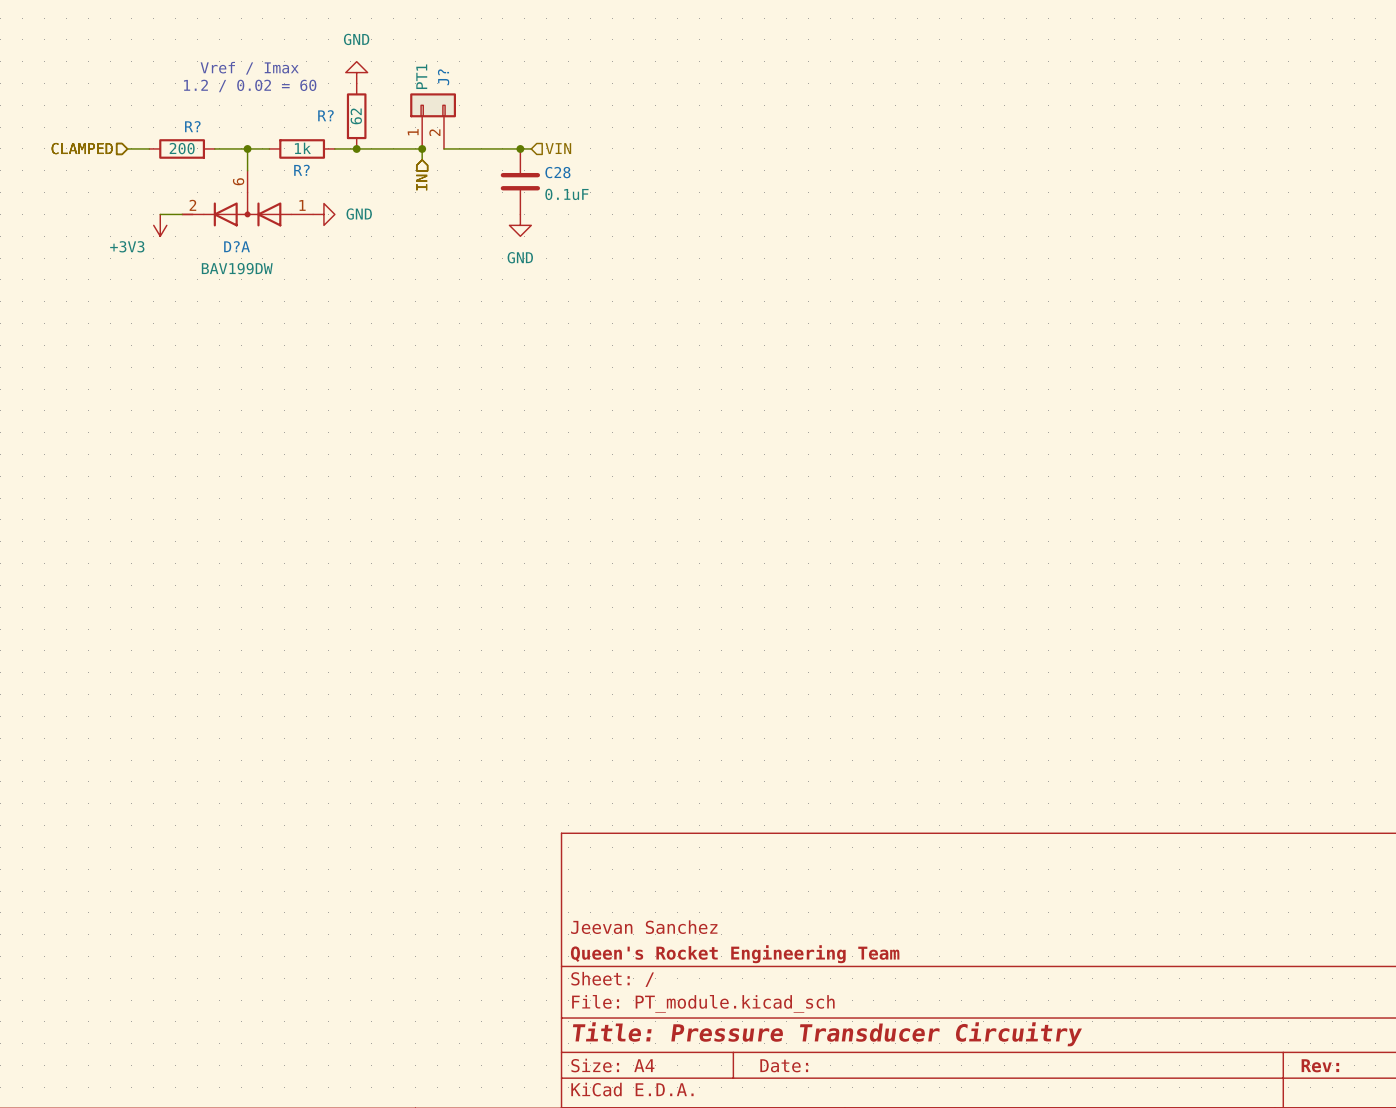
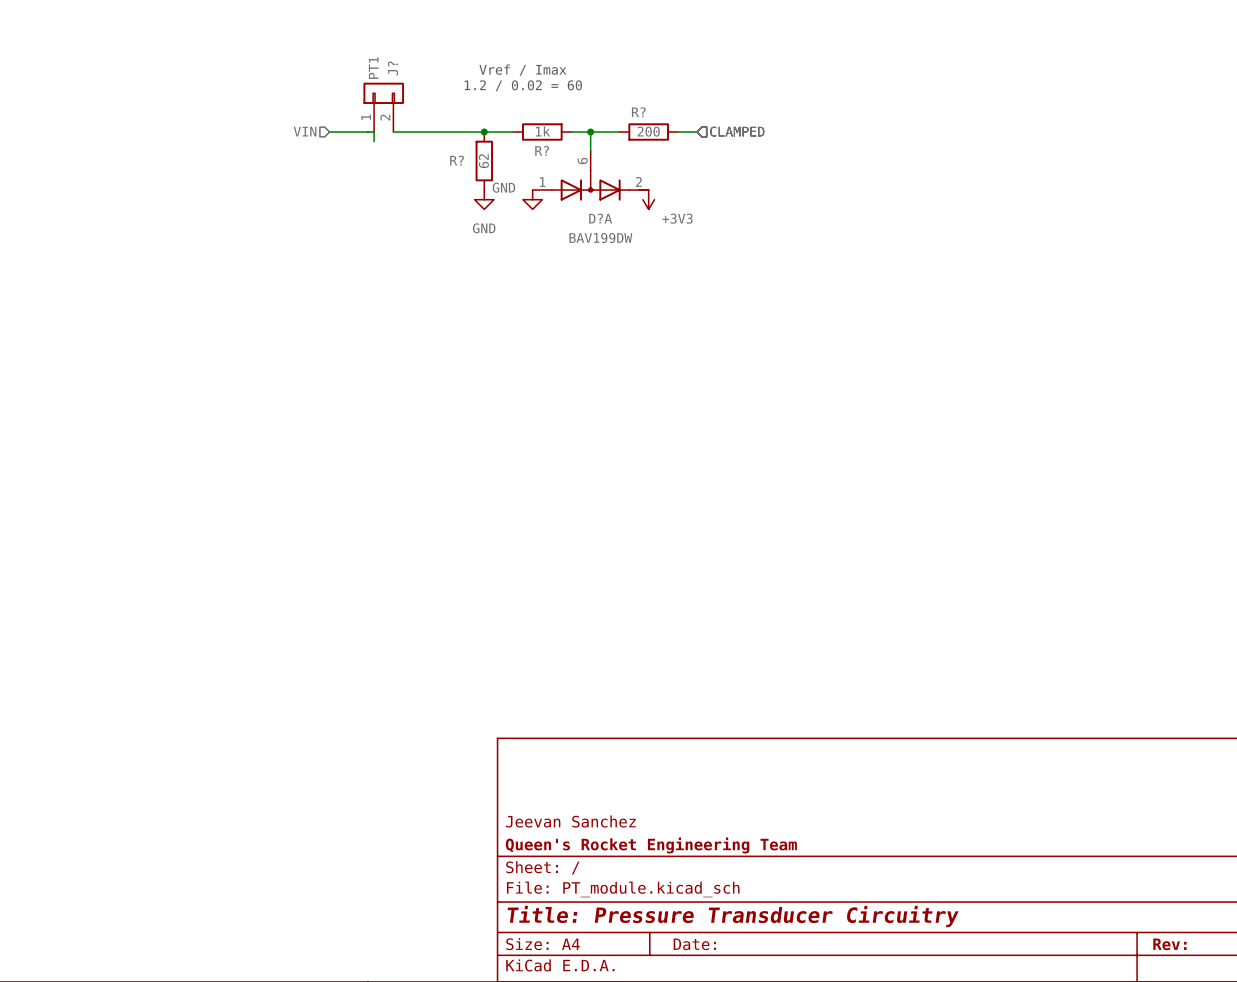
text: Vref / Imax (249, 68) -> none
power symbol: GND (356, 72) -> none
text: none -> Vref / Imax (522, 70)
text: 1.2 / 0.02 = 60 (250, 85) -> none
text: none -> 1.2 / 0.02 = 60 (523, 85)
R? position: (356, 116) -> (484, 161)
hierarchical label: CLAMPED (82, 148) -> none
wire: (127, 148) (149, 148) -> none
R?: 200 (182, 148) -> none
wire: (214, 148) (269, 148) -> none
wire: (247, 148) (247, 170) -> none
junction: (247, 148) -> none
R?: 1k (302, 148) -> none
wire: (334, 148) (371, 148) -> none
junction: (356, 148) -> none
junction: (422, 148) -> none
junction position: (520, 148) -> (484, 132)
wire: none -> (470, 132) (513, 132)
hierarchical label rotation: 0° (558, 148) -> 180° (305, 131)
hierarchical label position: VIN (558, 148) -> VIN (305, 131)
R?: none -> 1k (542, 132)
wire: none -> (571, 132) (619, 132)
wire: none -> (590, 132) (590, 151)
junction: none -> (590, 132)
R?: none -> 200 (648, 132)
wire: none -> (677, 132) (697, 132)
hierarchical label: none -> CLAMPED (737, 131)
C28: 0.1uF (520, 181) -> none
hierarchical label: IN (421, 182) -> none
D?A: BAV199DW (247, 198) -> none
D?A: none -> BAV199DW (590, 175)
wire: (160, 214) (182, 214) -> none
power symbol: GND (323, 214) -> none
power symbol: +3V3 (160, 225) -> none
power symbol position: GND (520, 225) -> GND (484, 199)
power symbol: none -> GND (532, 199)
power symbol: none -> +3V3 (648, 199)

